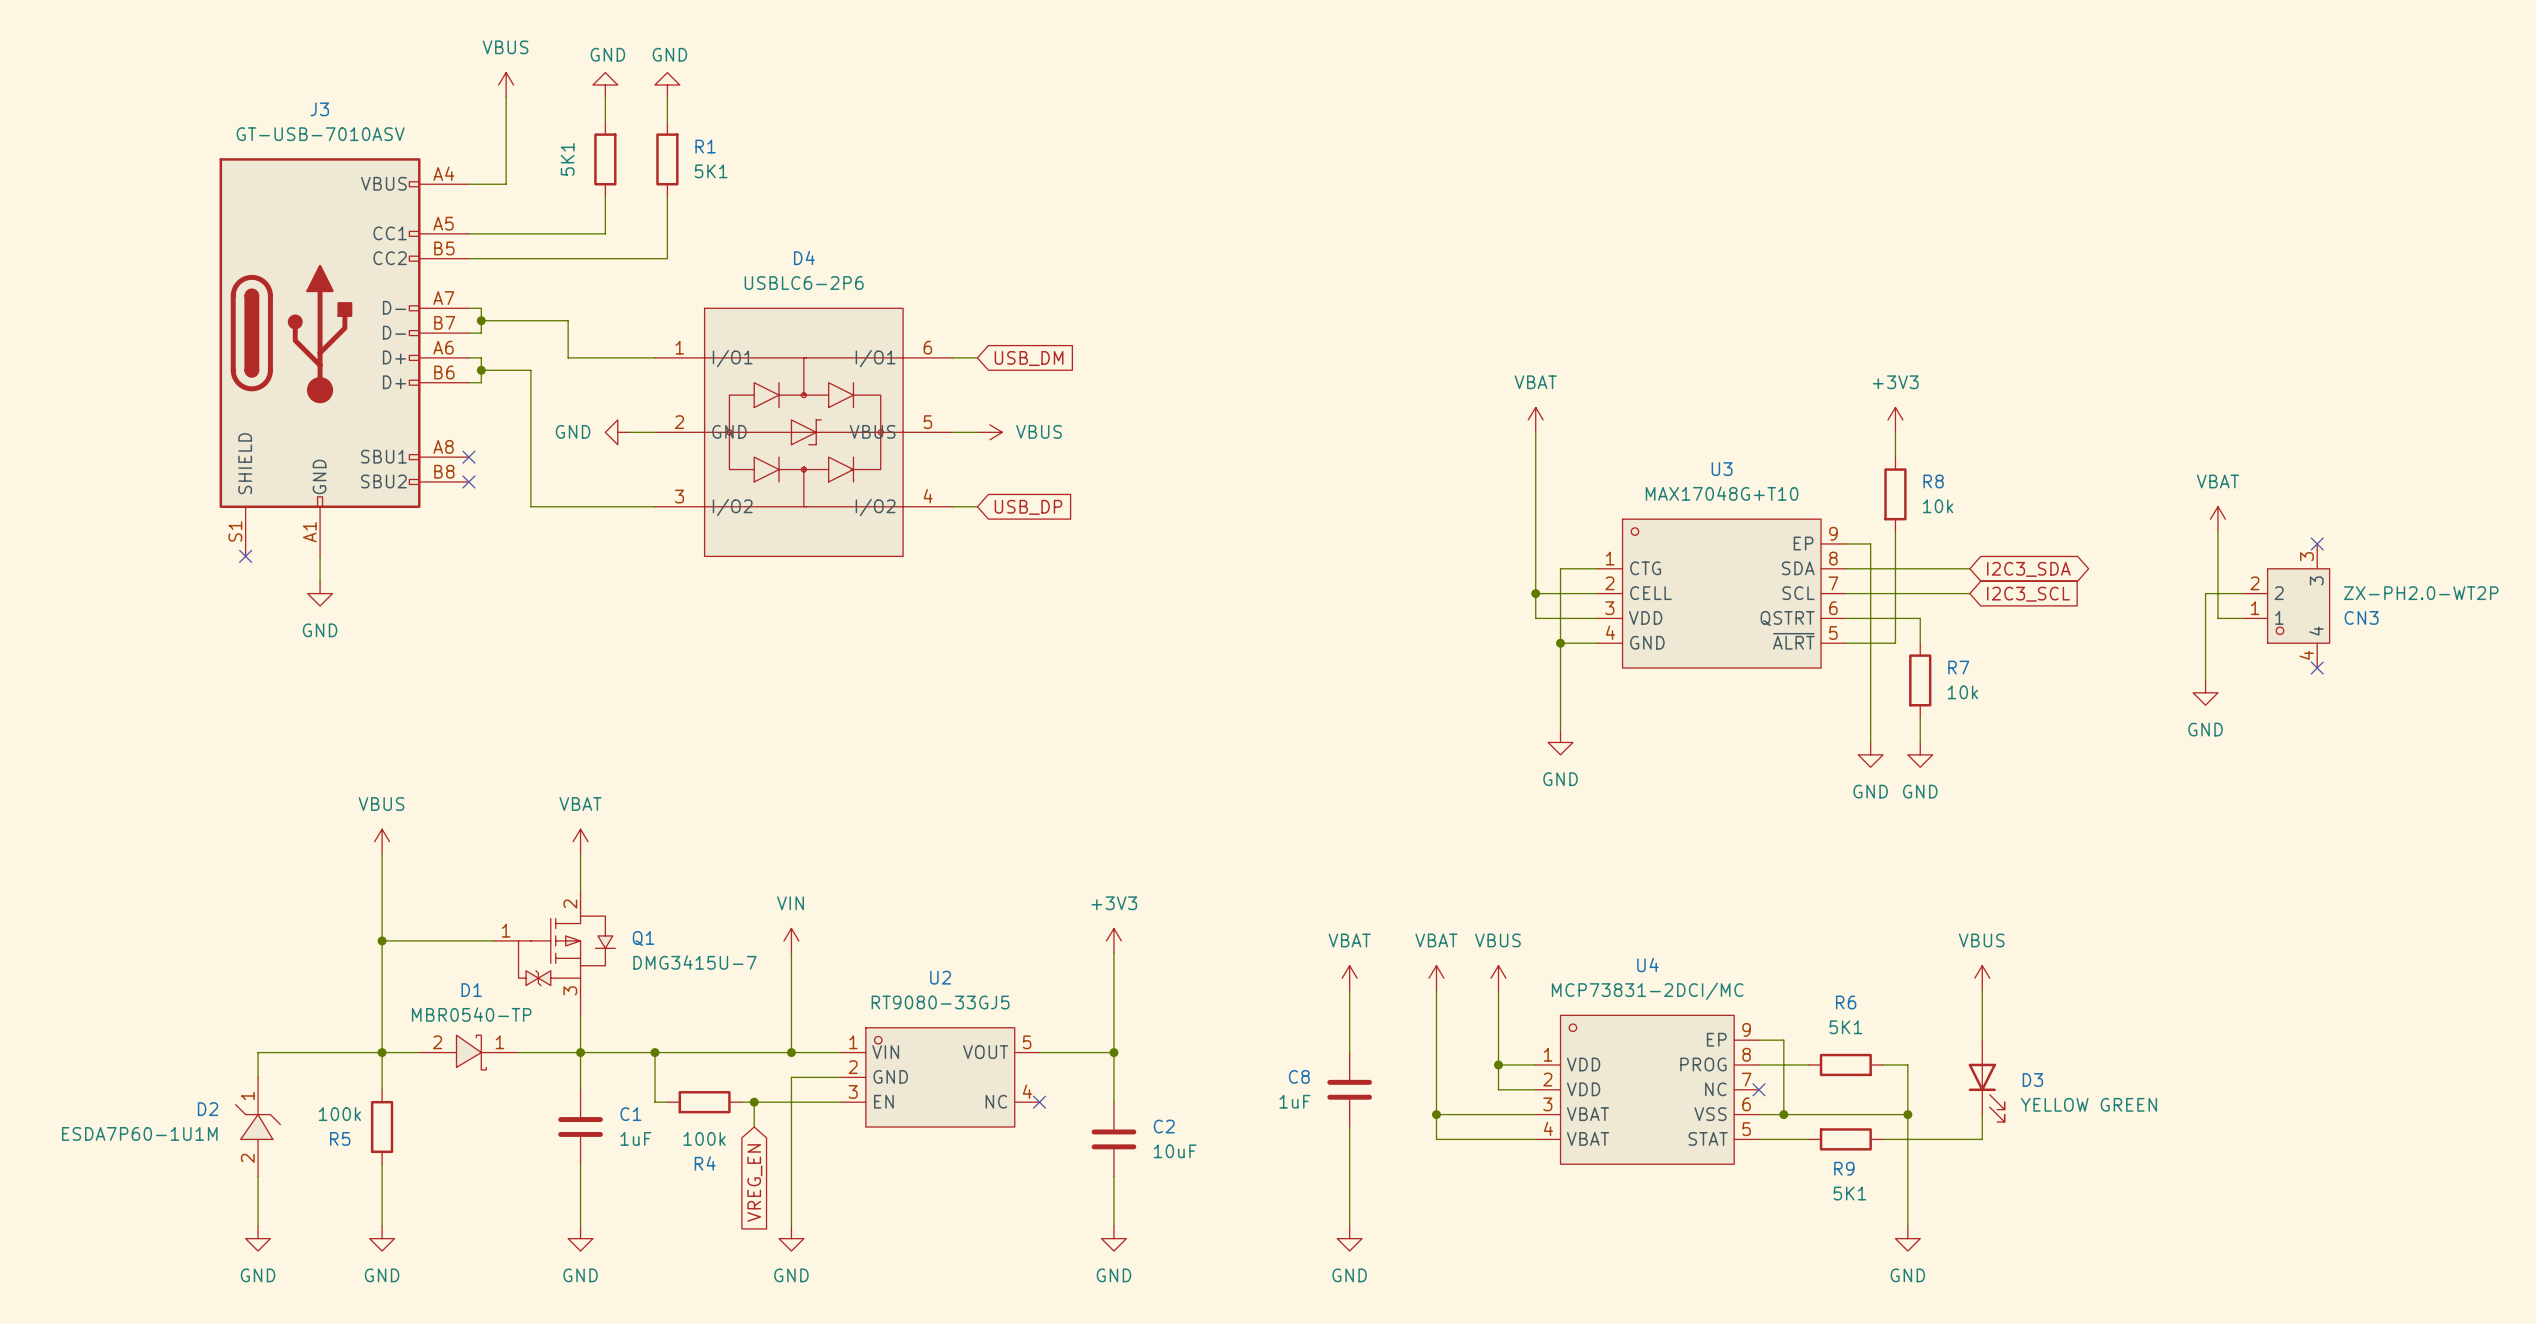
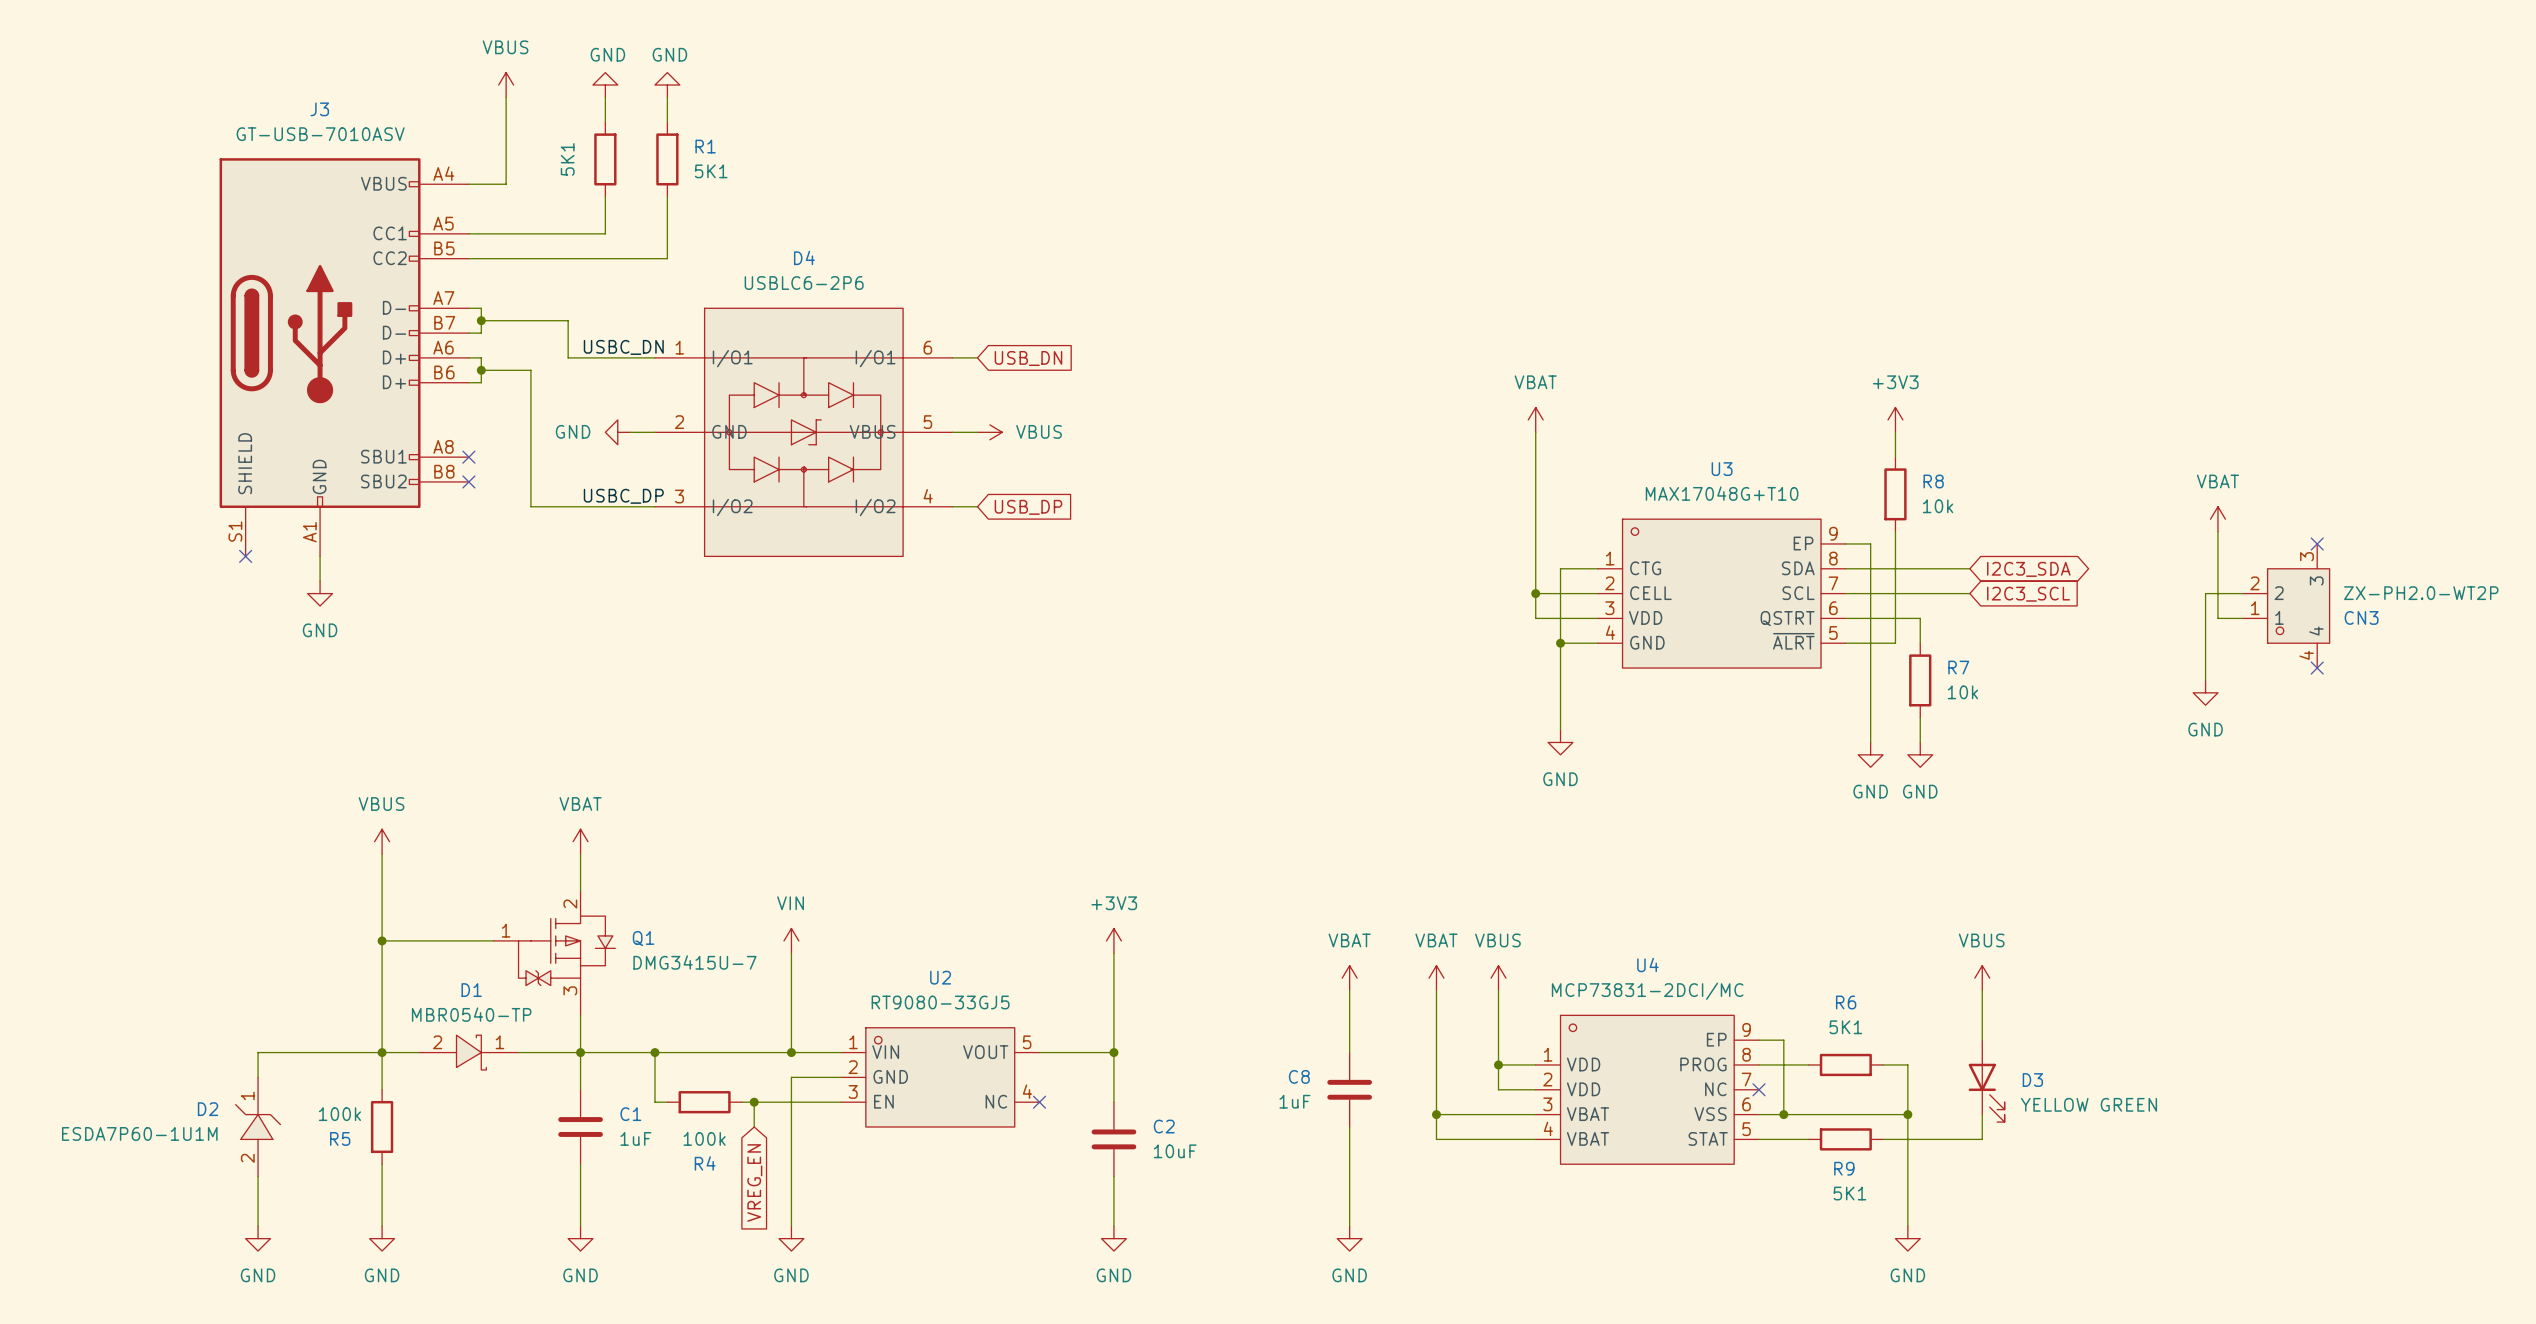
label: none -> USBC_DN (623, 347)
global label: USB_DM (1029, 358) -> USB_DN (1028, 358)
label: none -> USBC_DP (623, 496)

